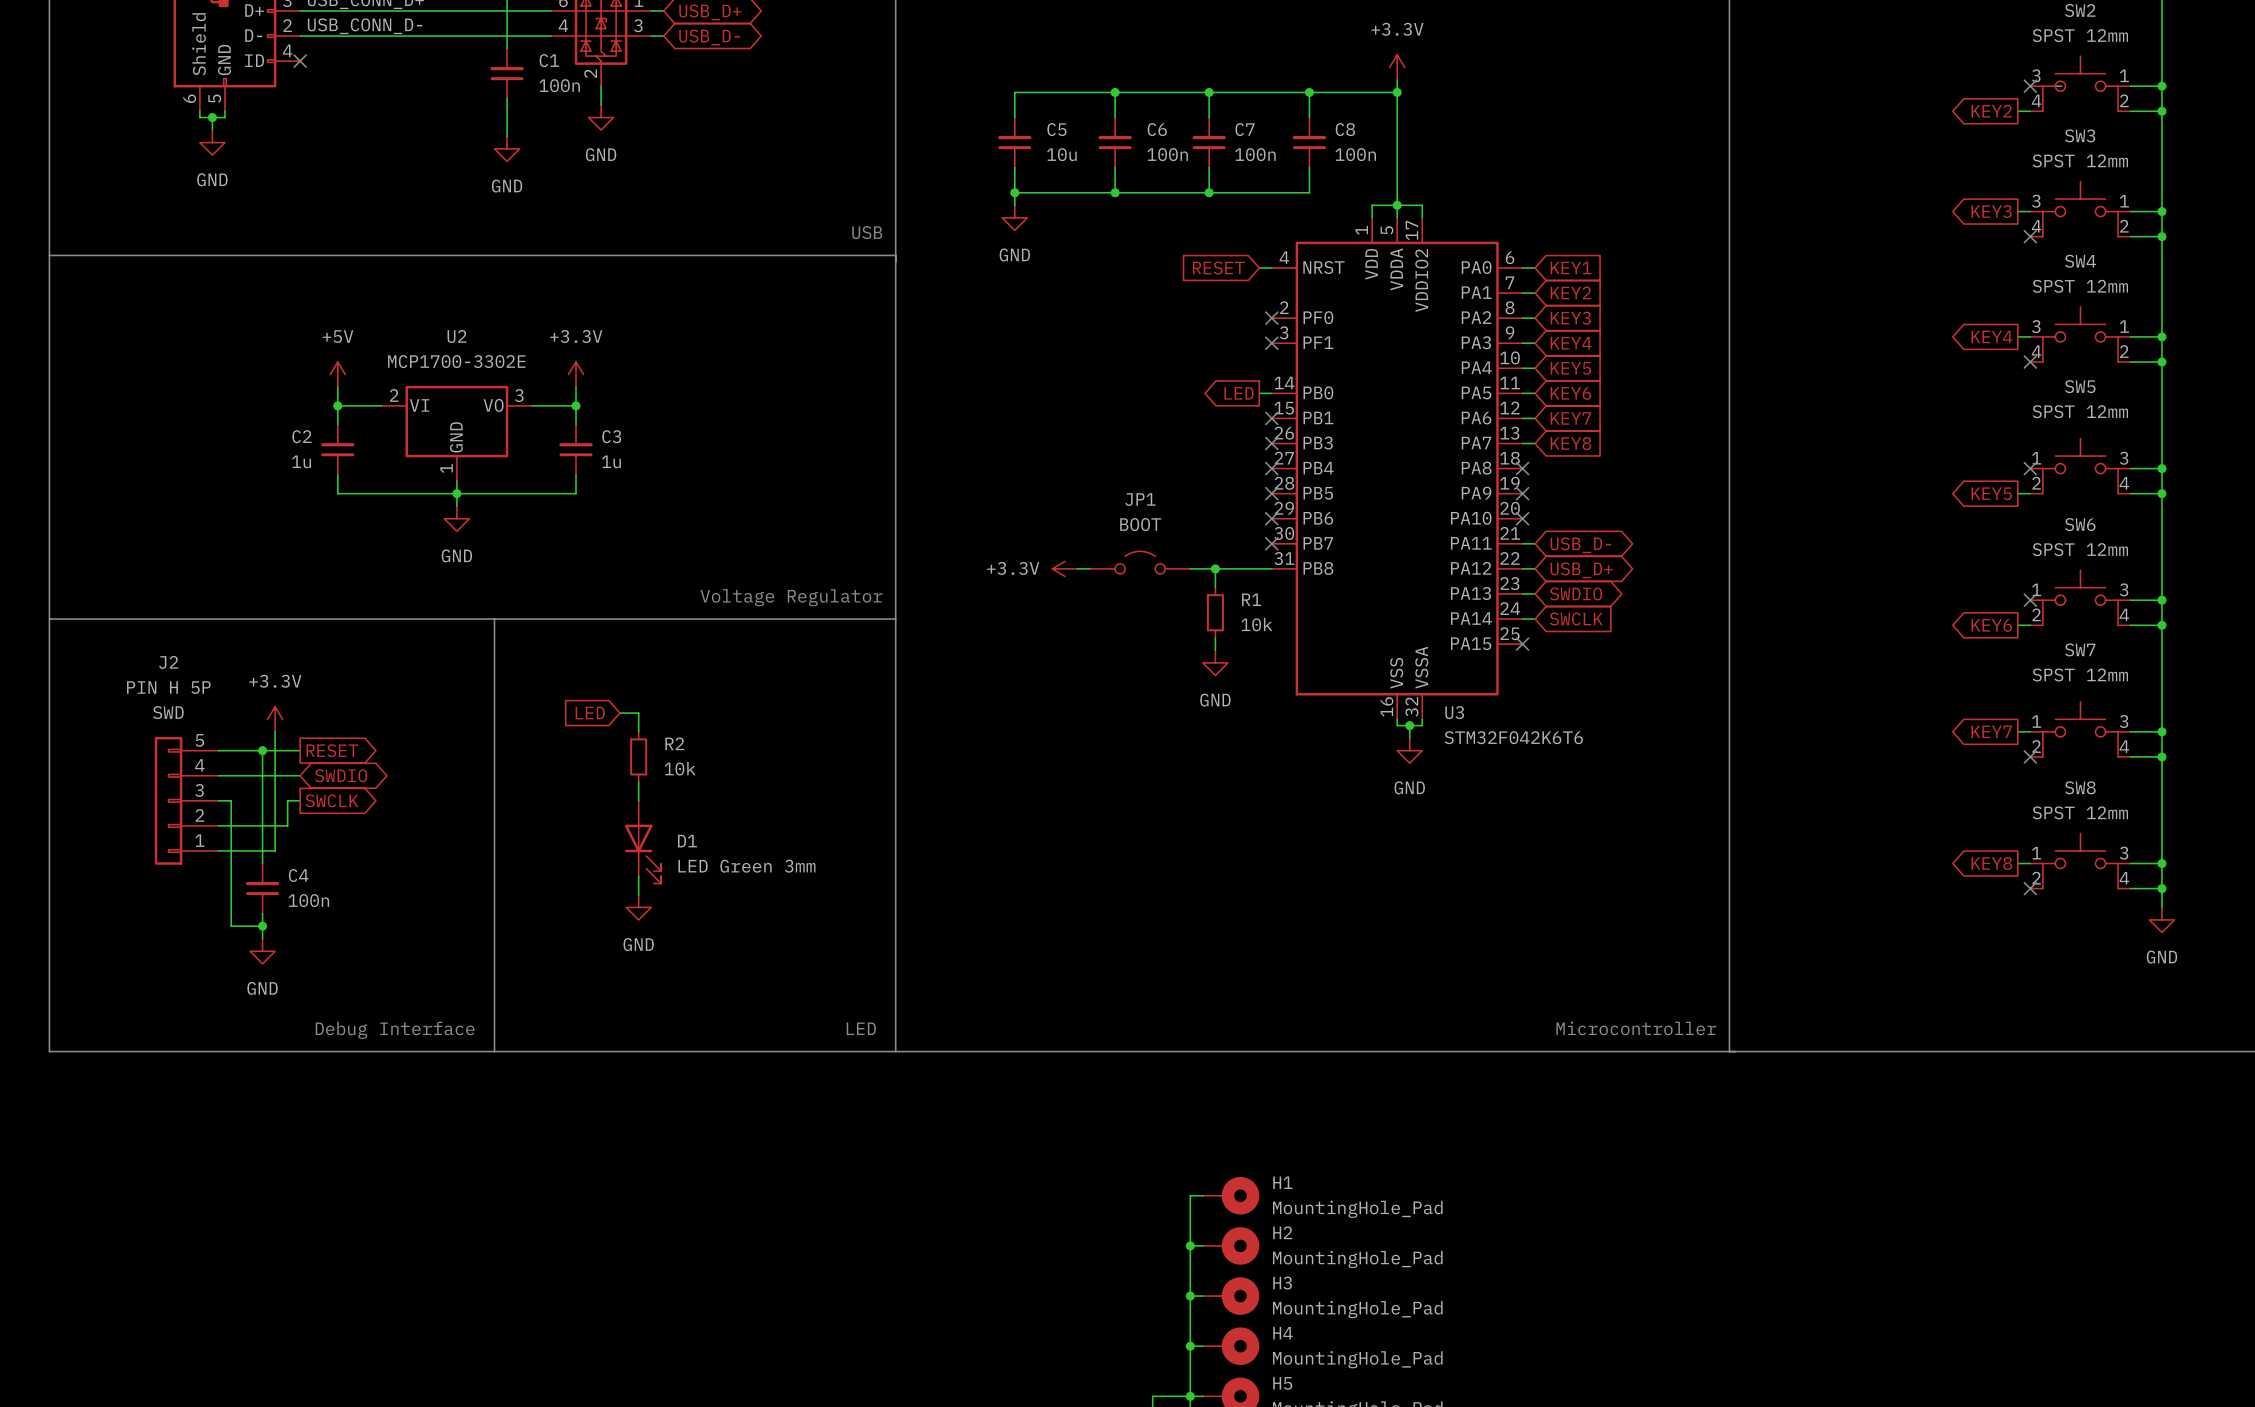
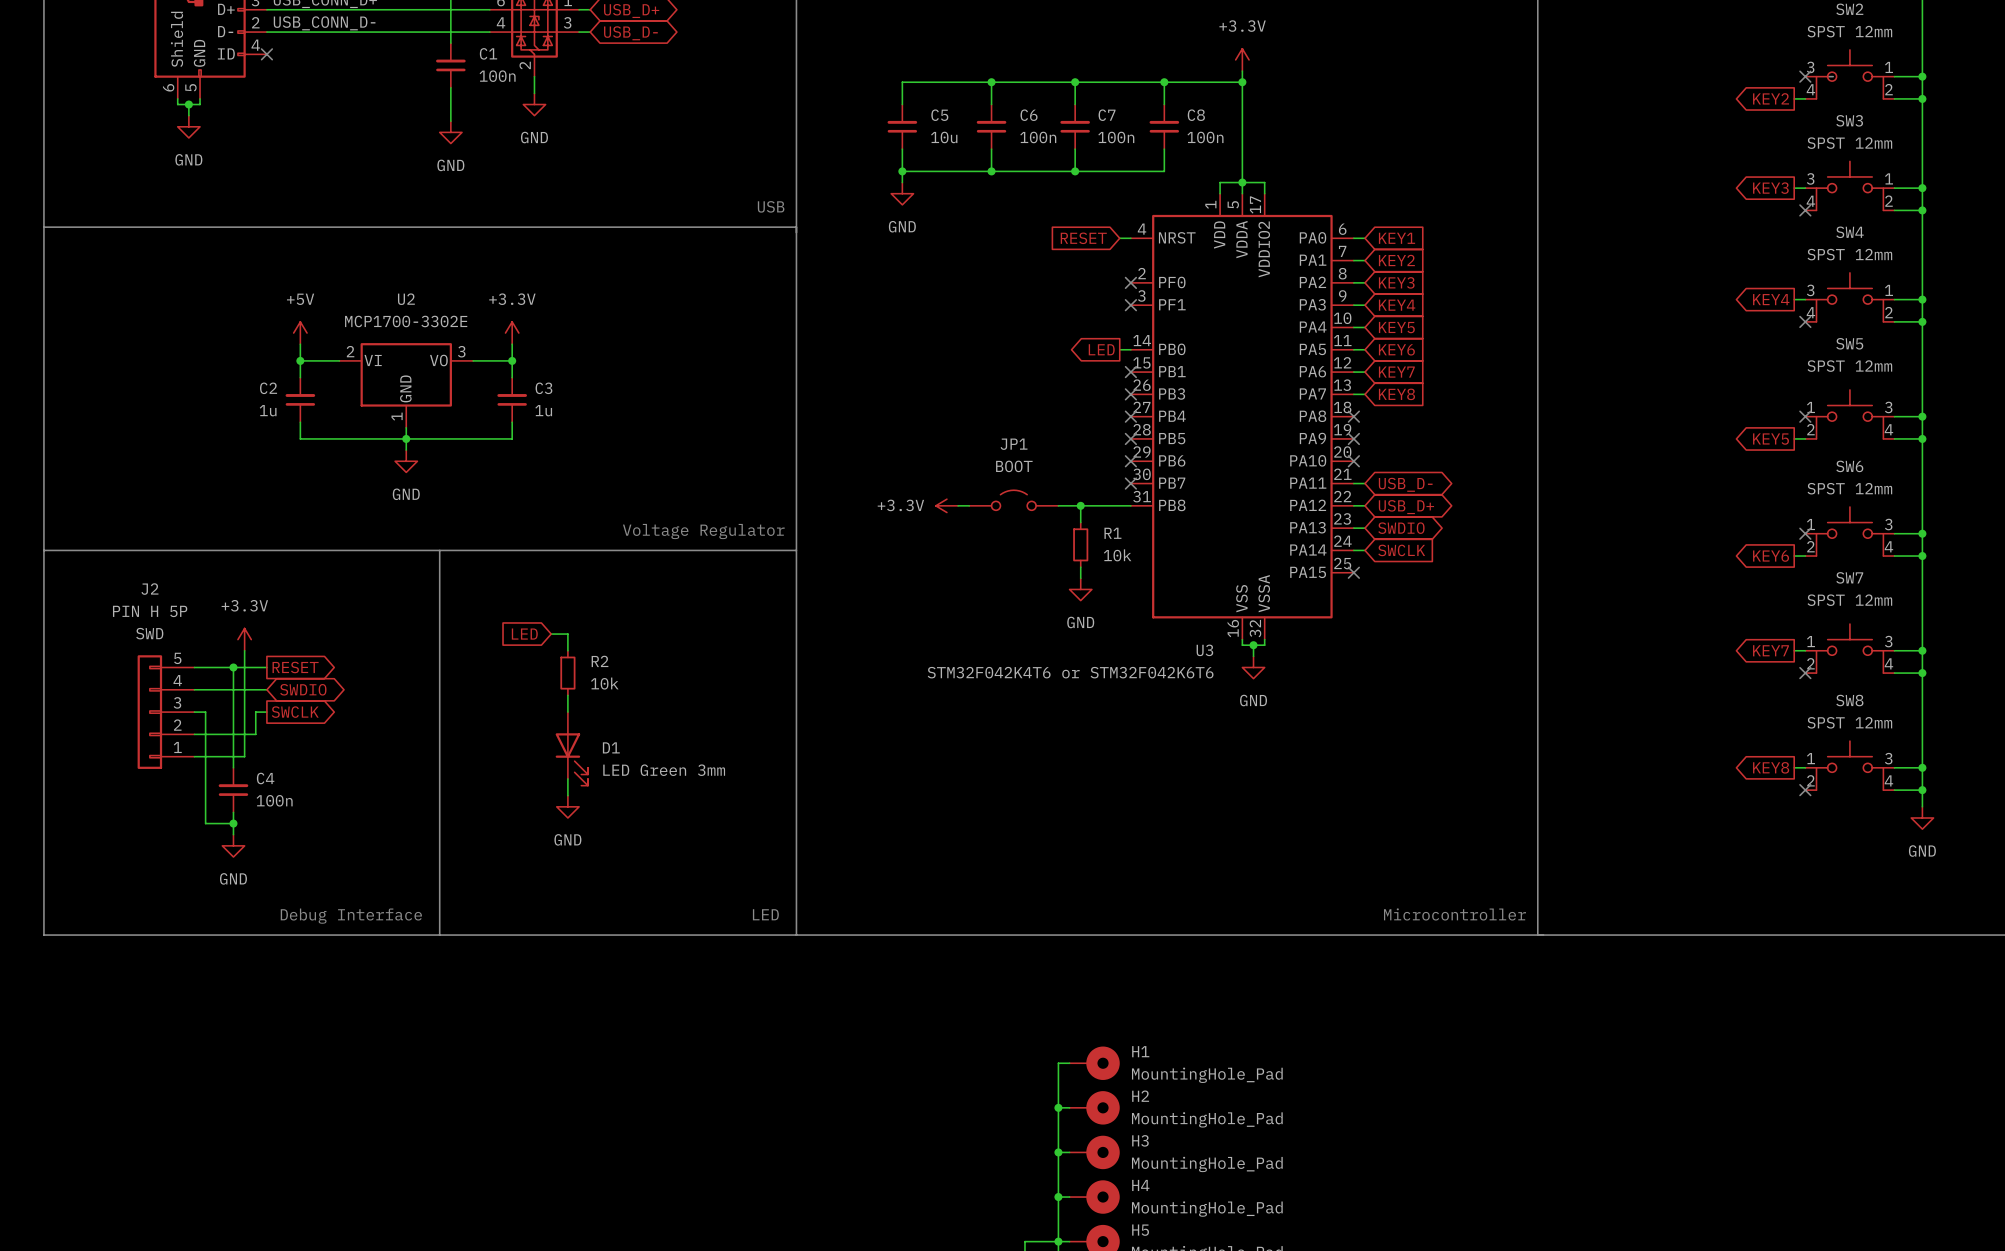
U3 name position: U3 (1454, 712) -> U3 (1204, 650)
U3 value: STM32F042K6T6 (1513, 737) -> STM32F042K4T6 or STM32F042K6T6 (1070, 672)

